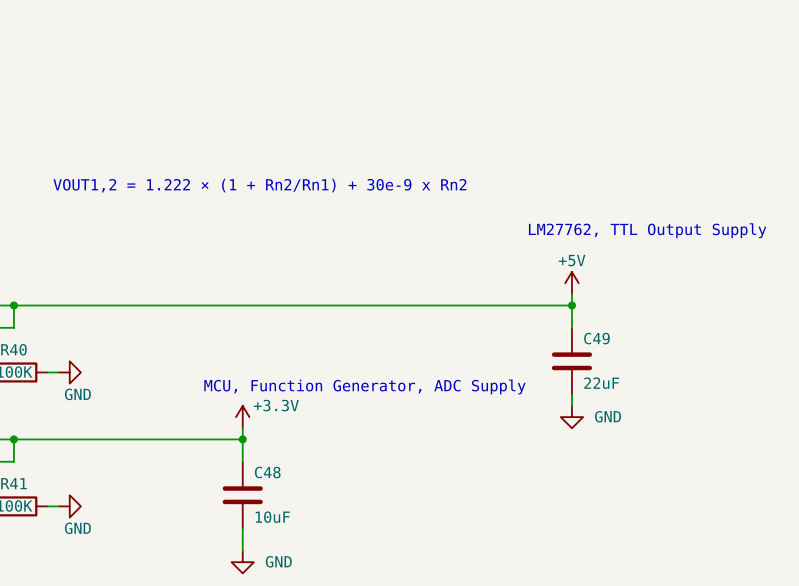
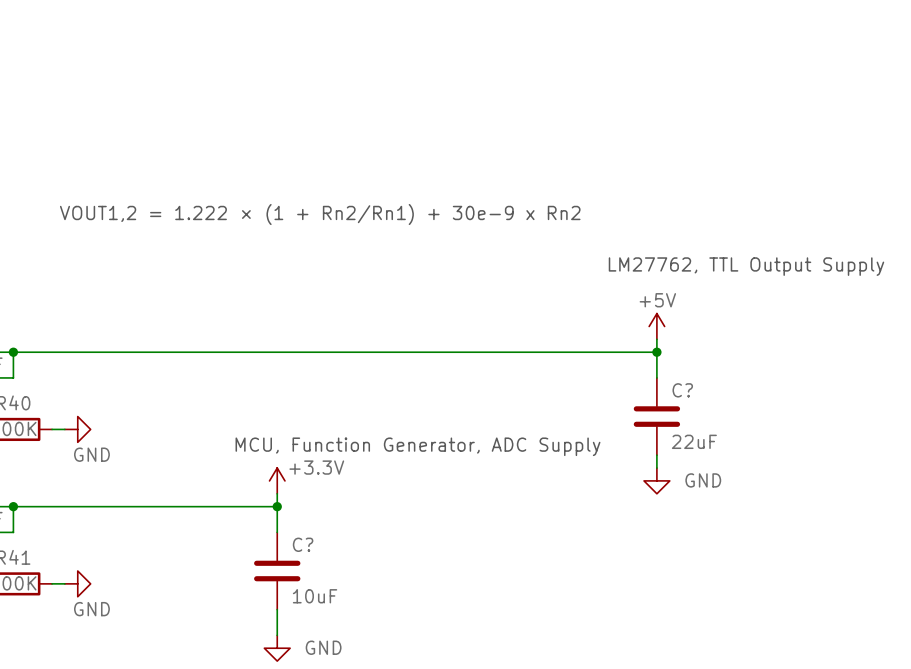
C49 name: C49 (596, 338) -> C? (682, 390)
C48 name: C48 (267, 472) -> C? (303, 544)

